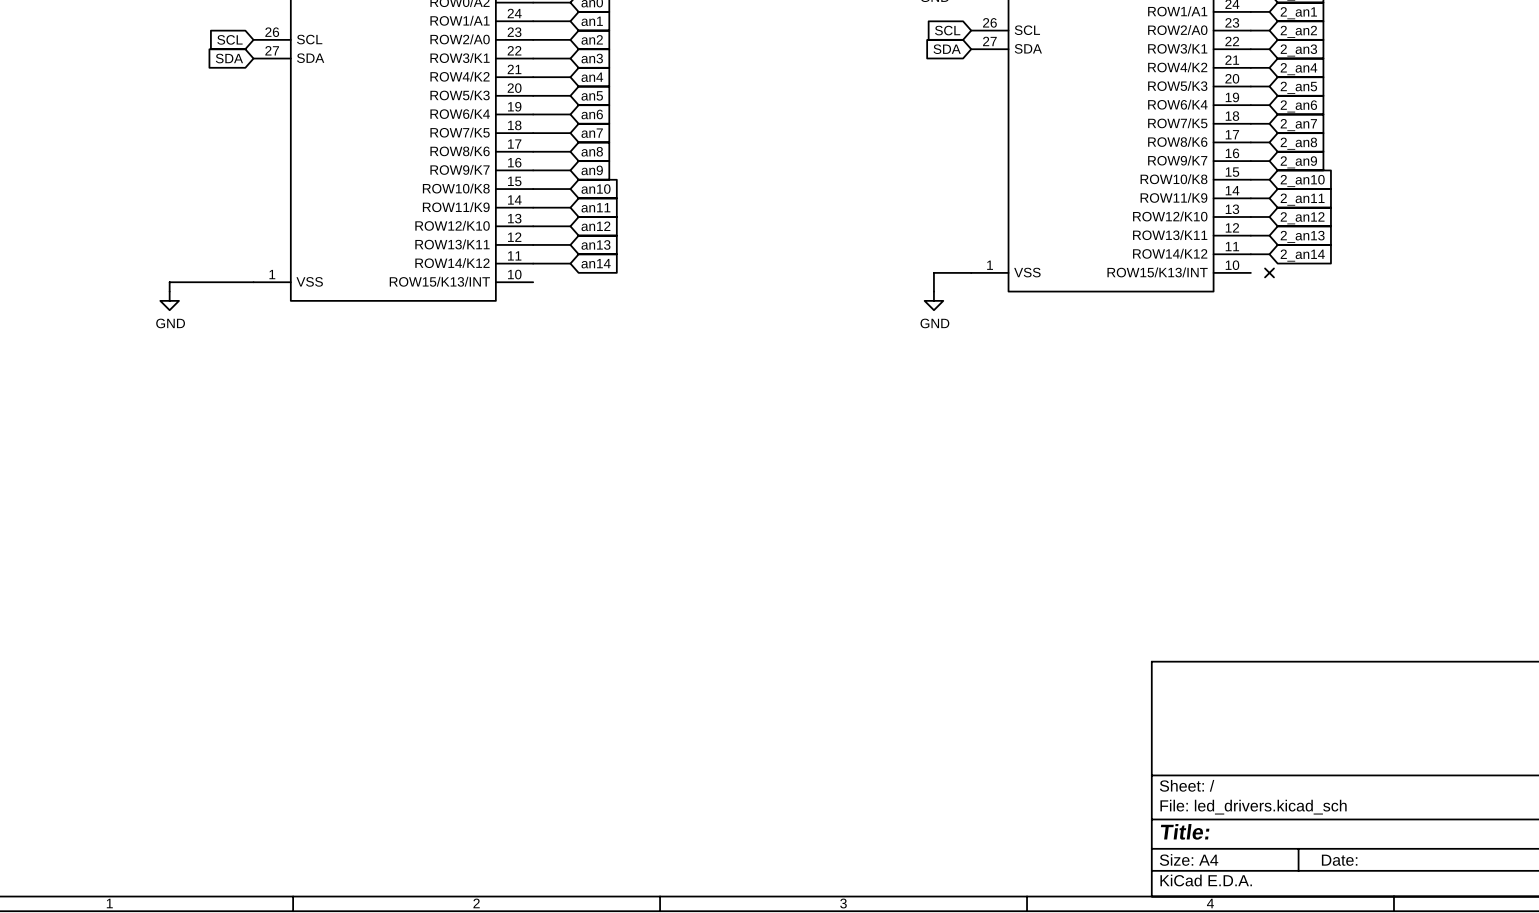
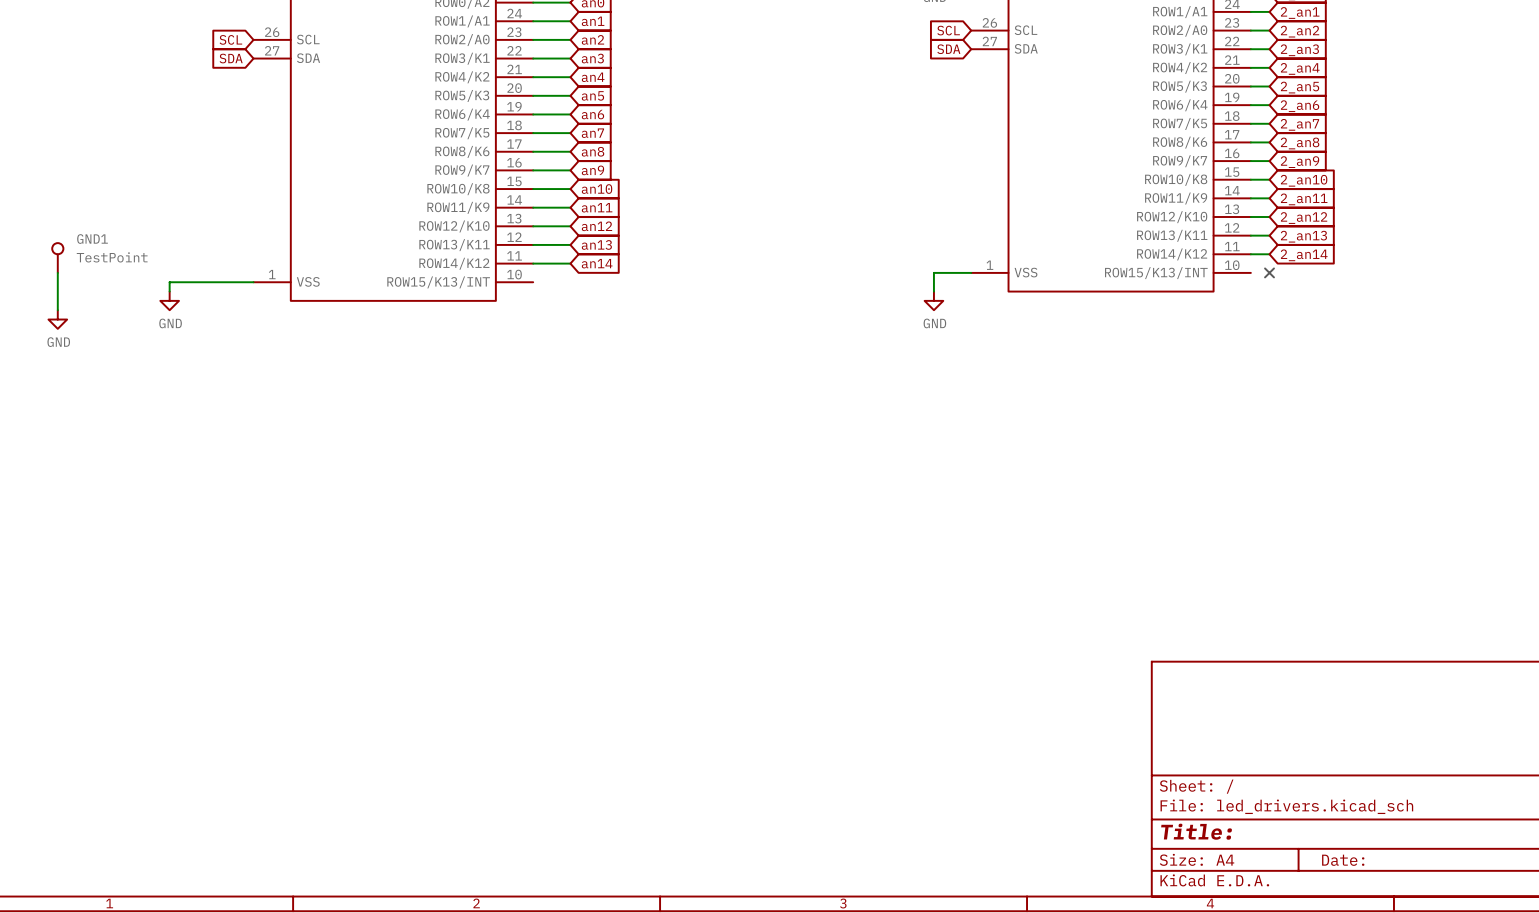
GND1: none -> TestPoint (57, 258)
wire: none -> (57, 272) (57, 310)
power symbol: none -> GND (57, 319)

